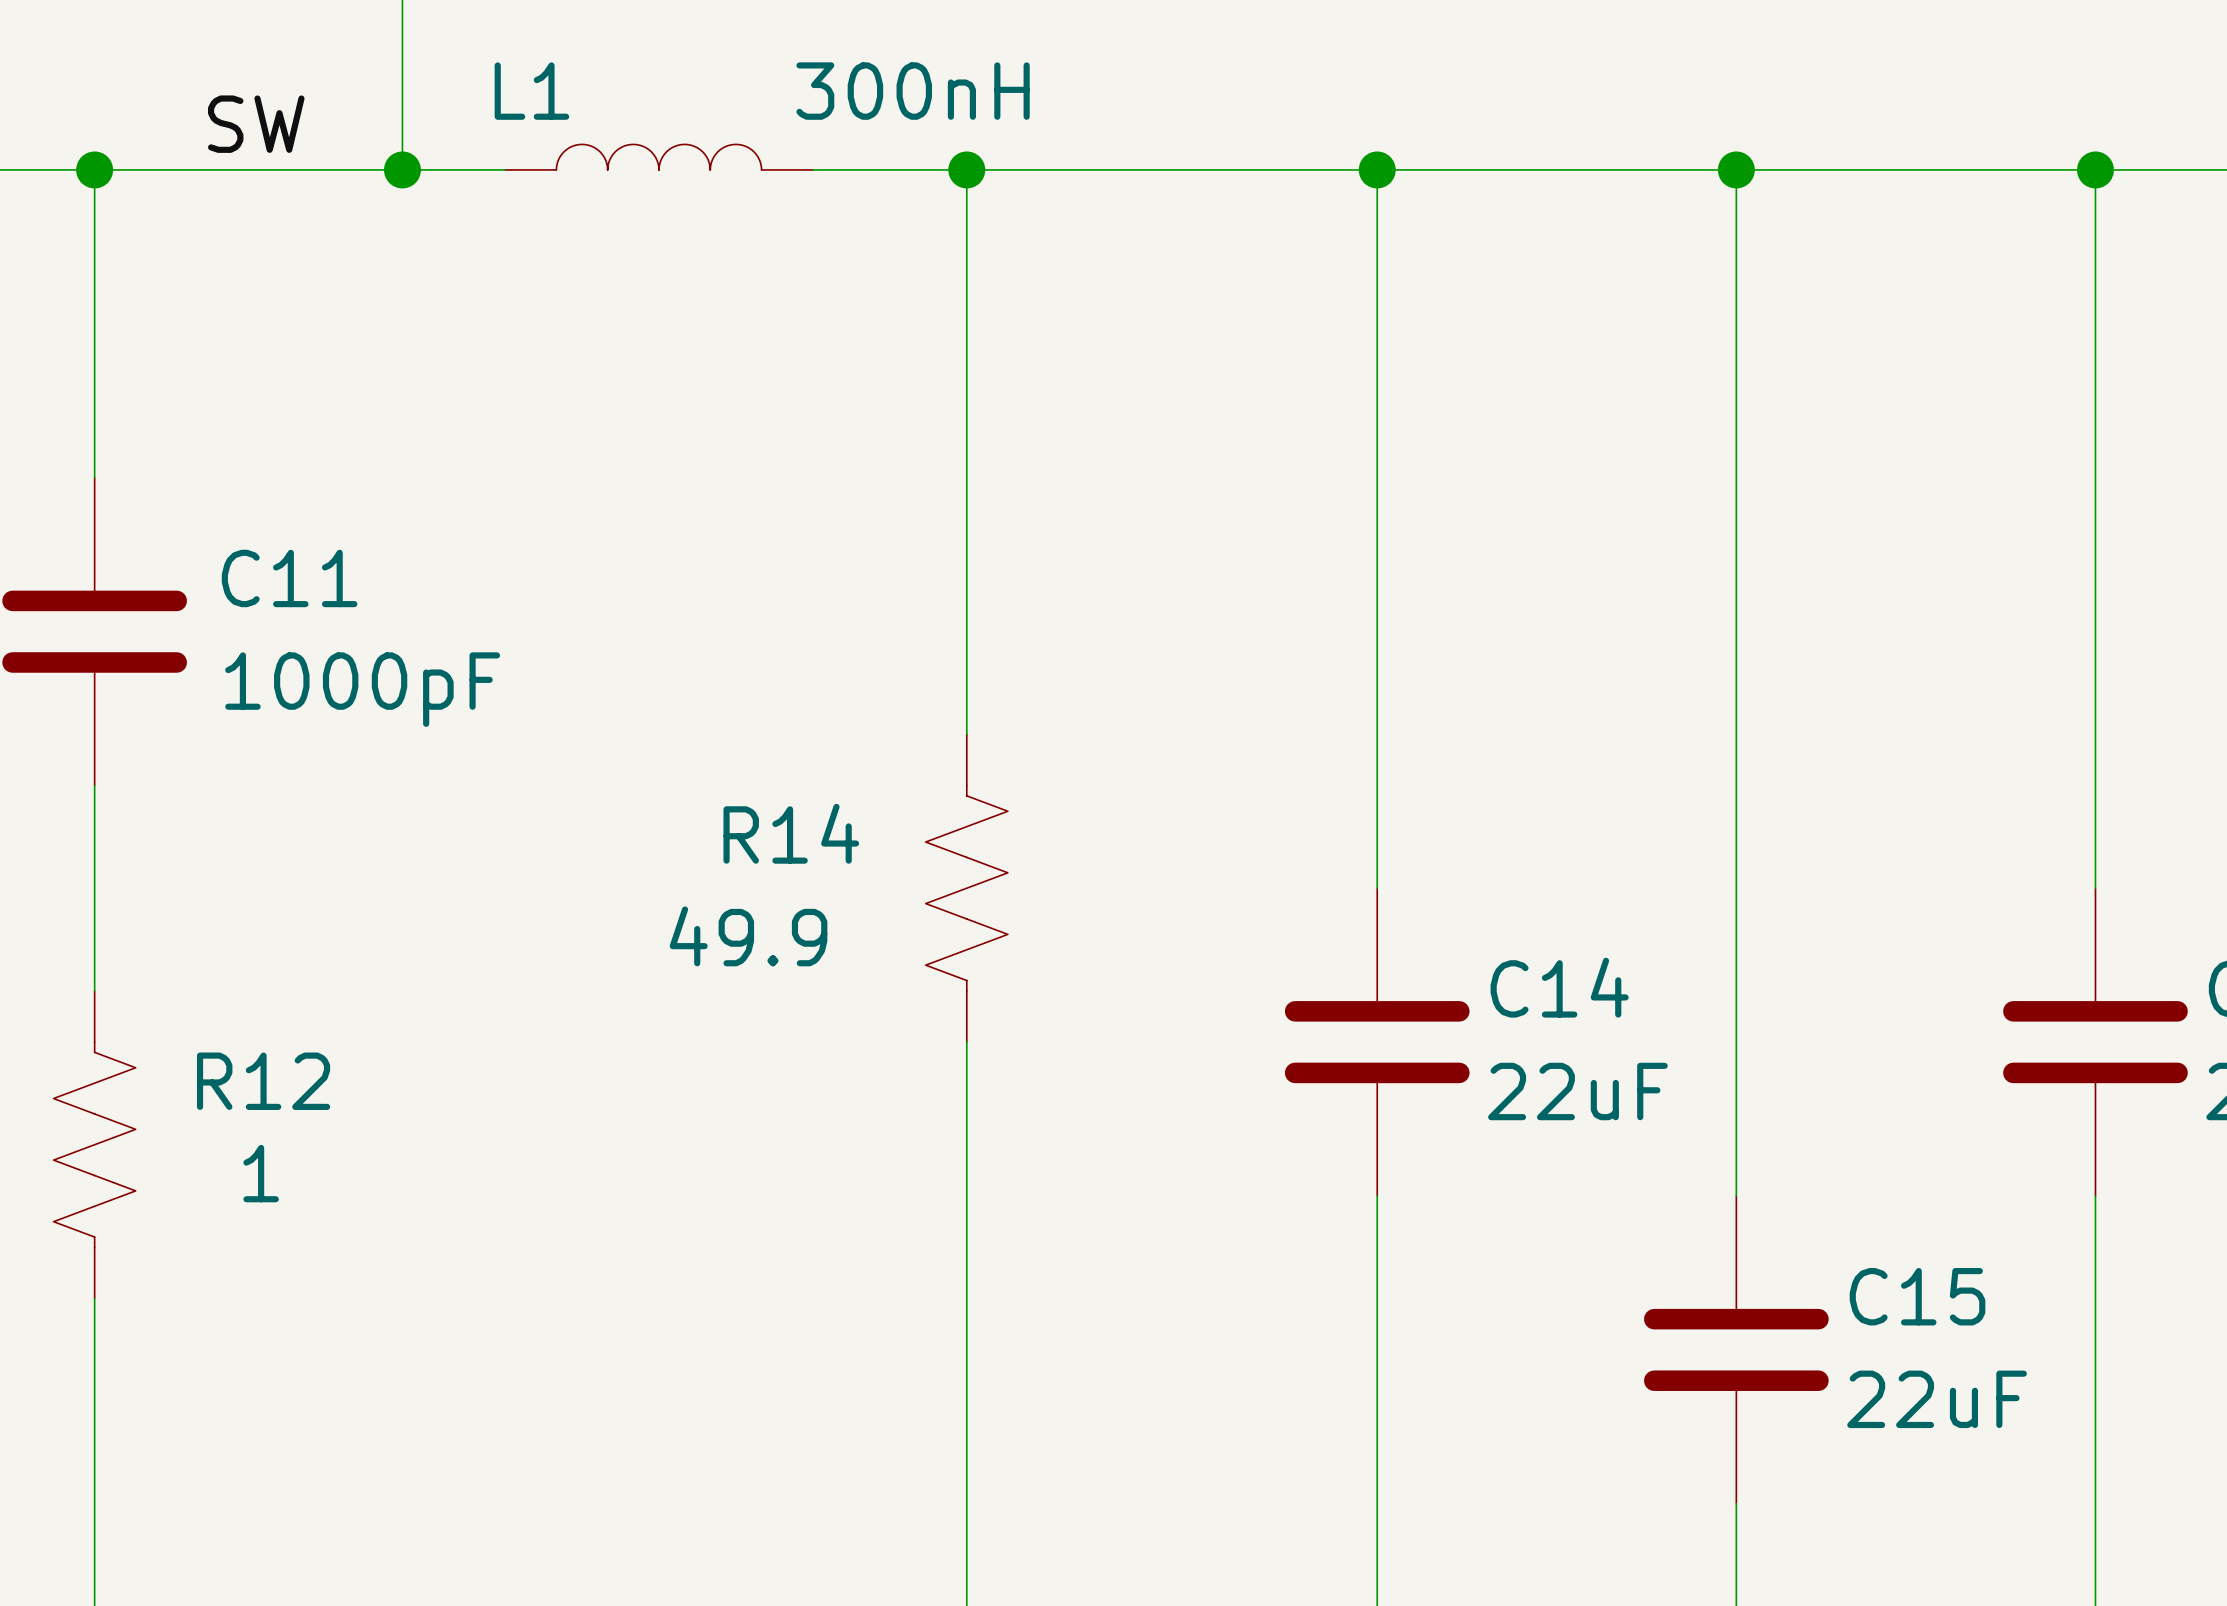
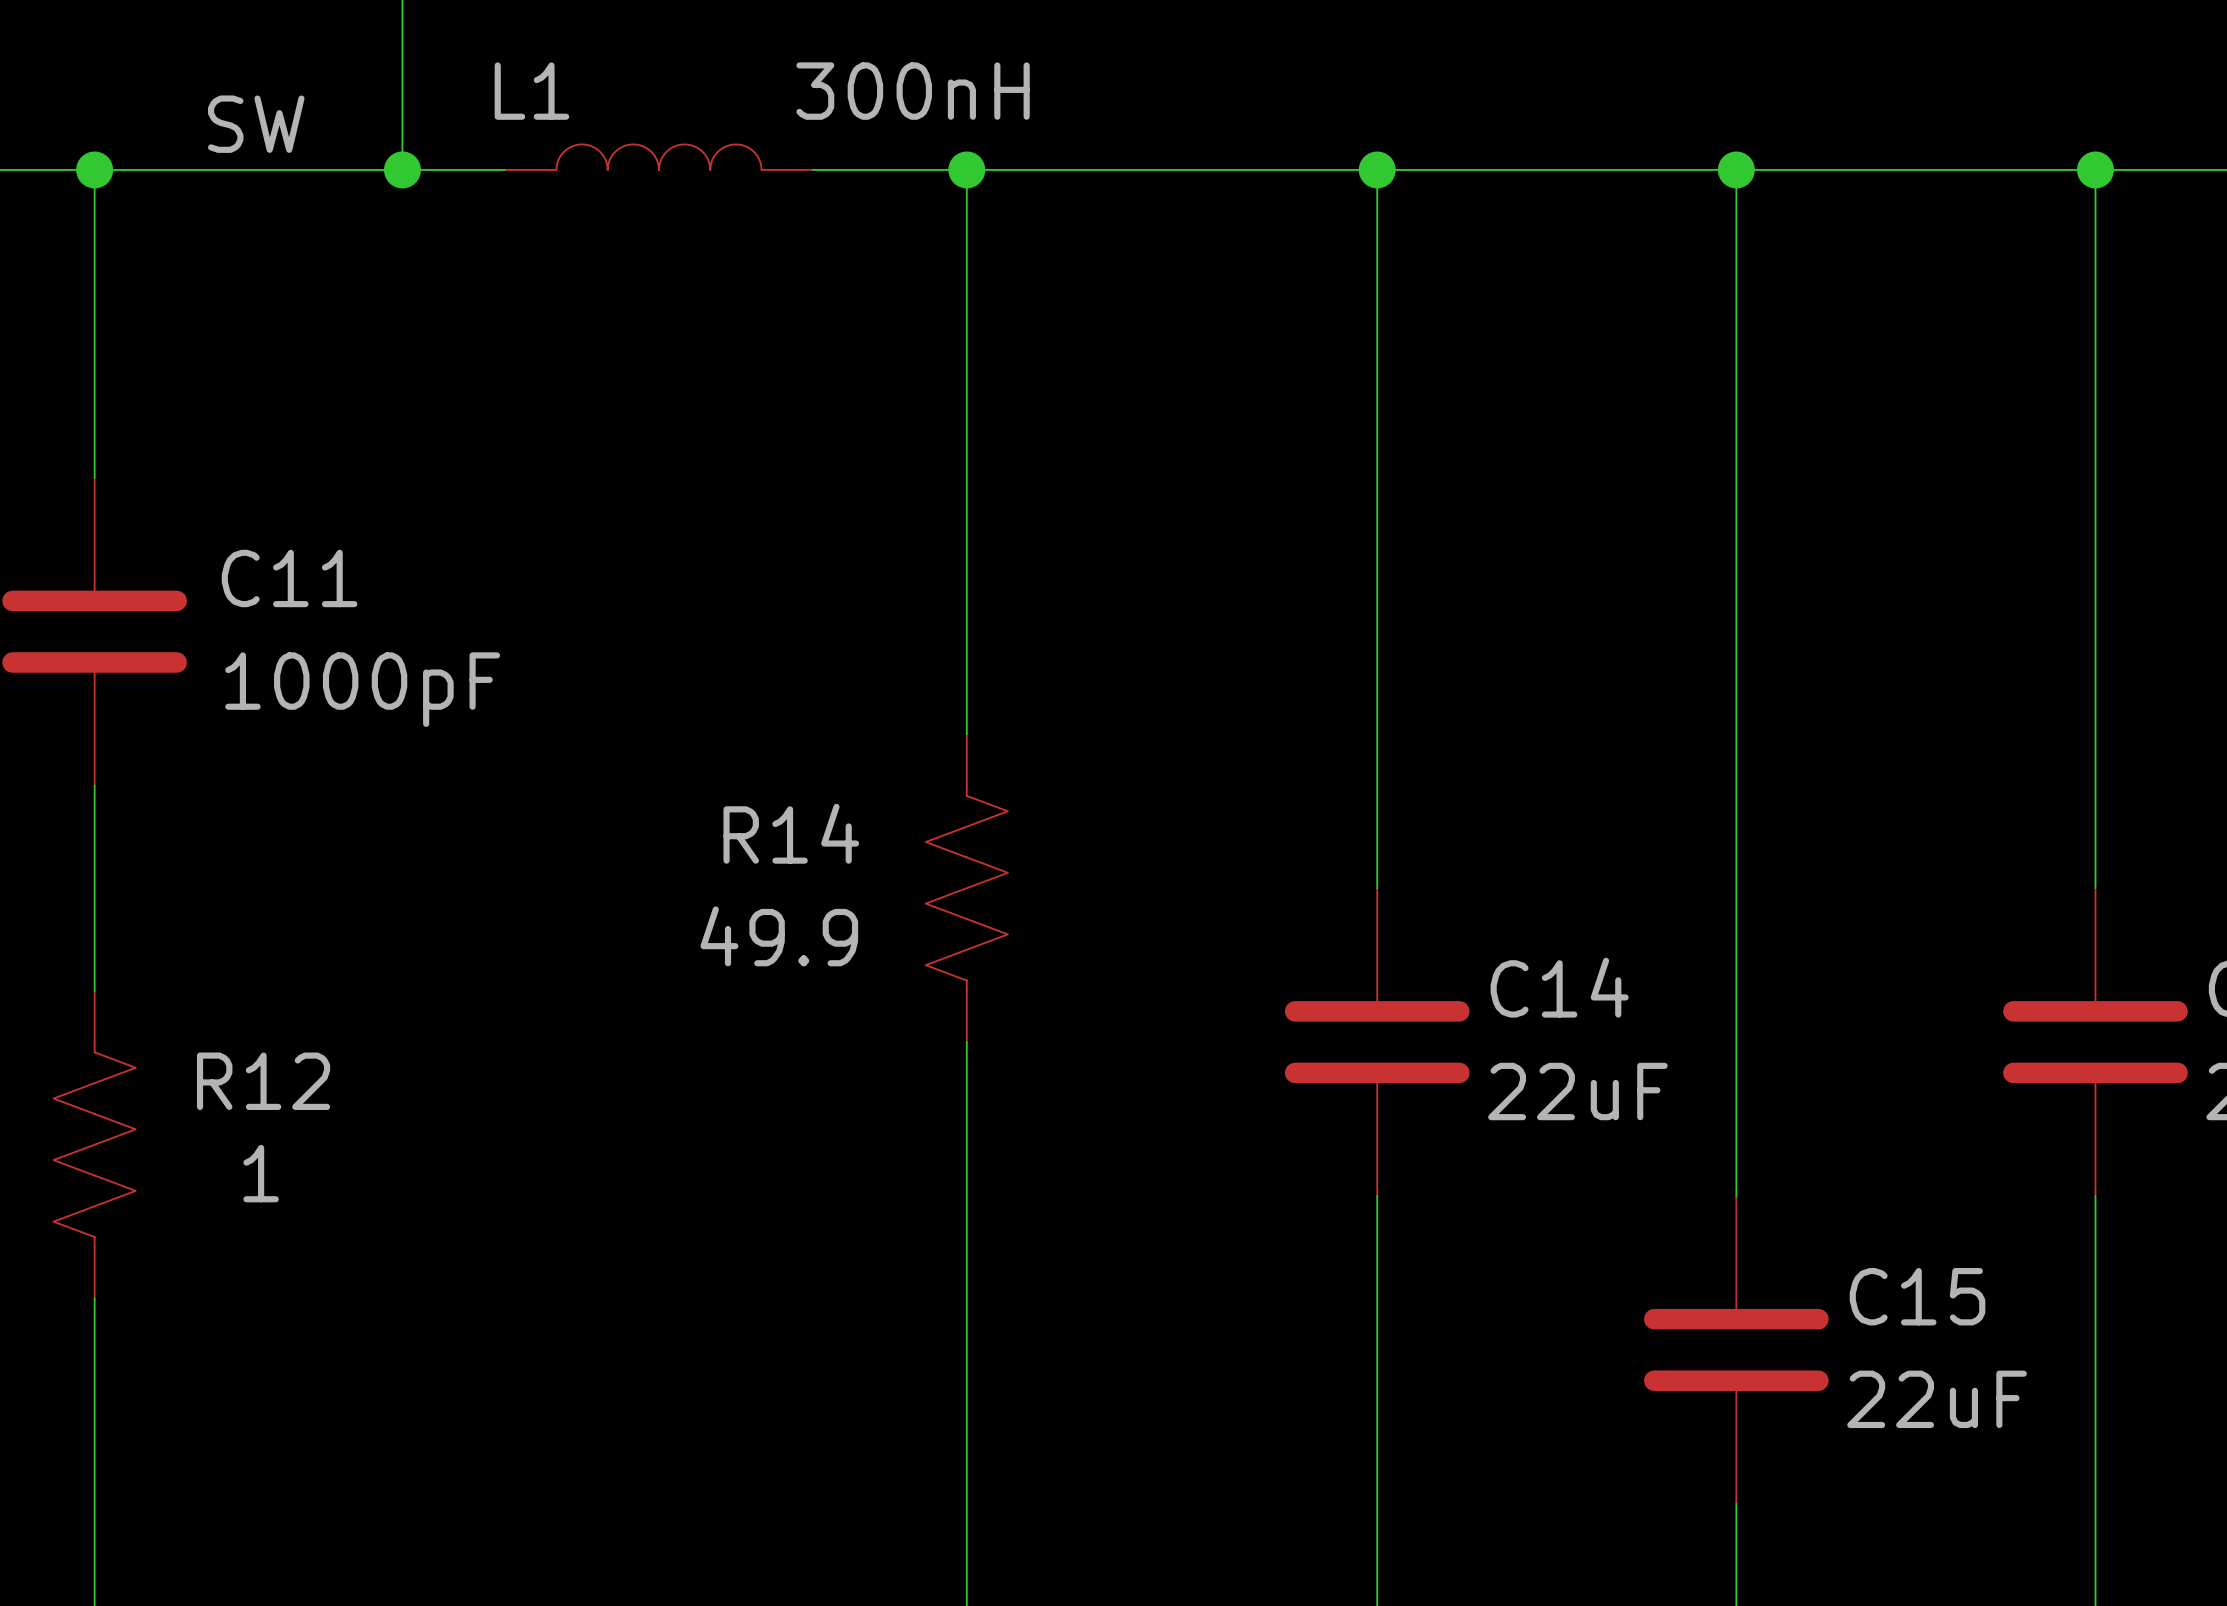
R14 value position: 49.9 (748, 936) -> 49.9 (779, 936)

